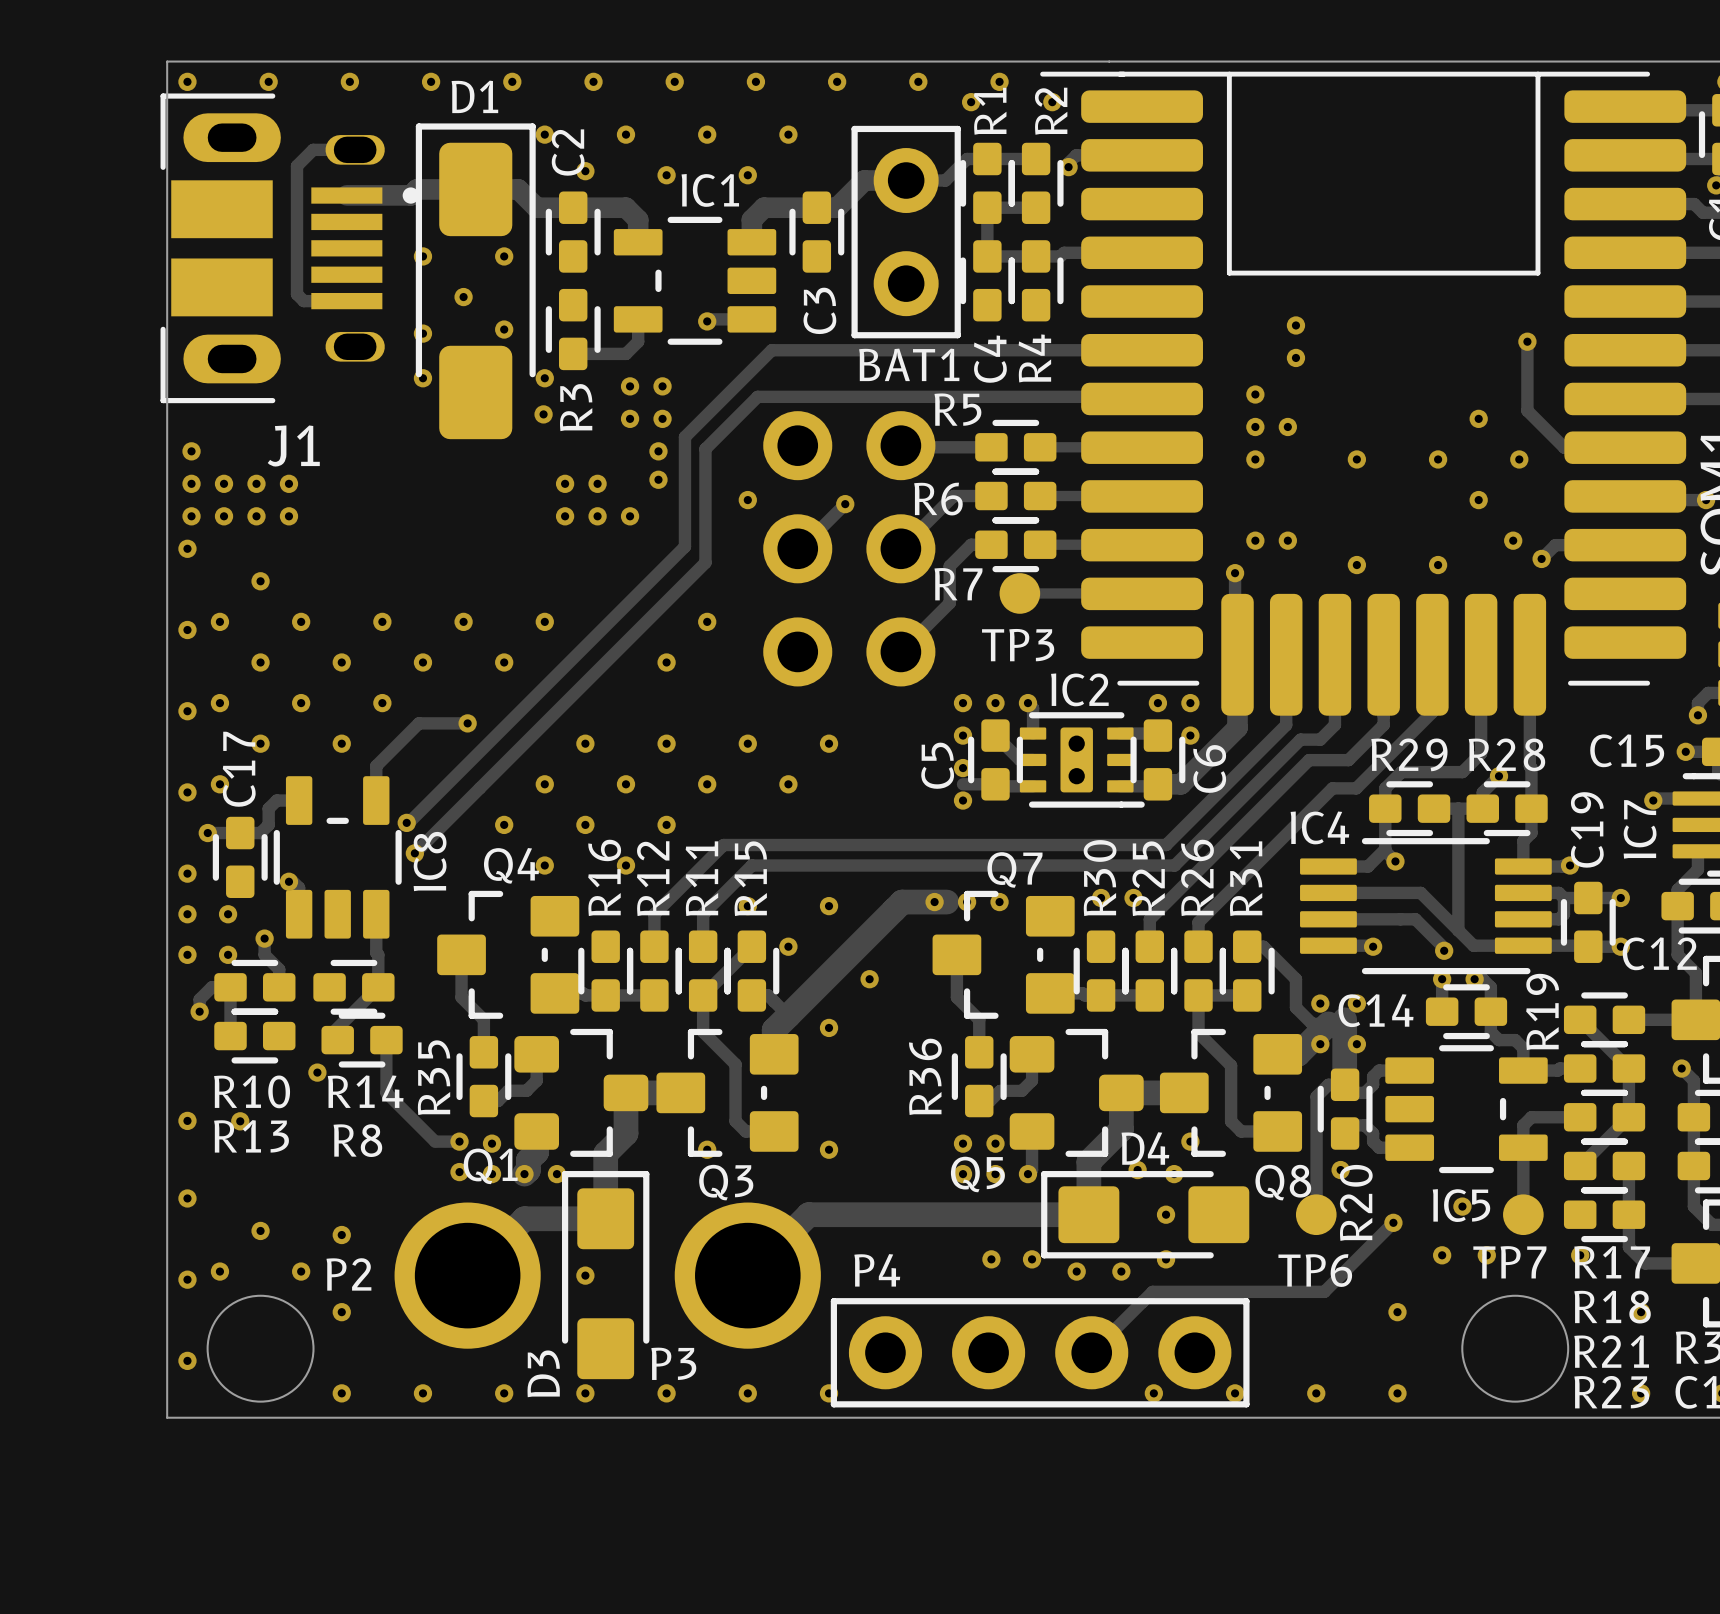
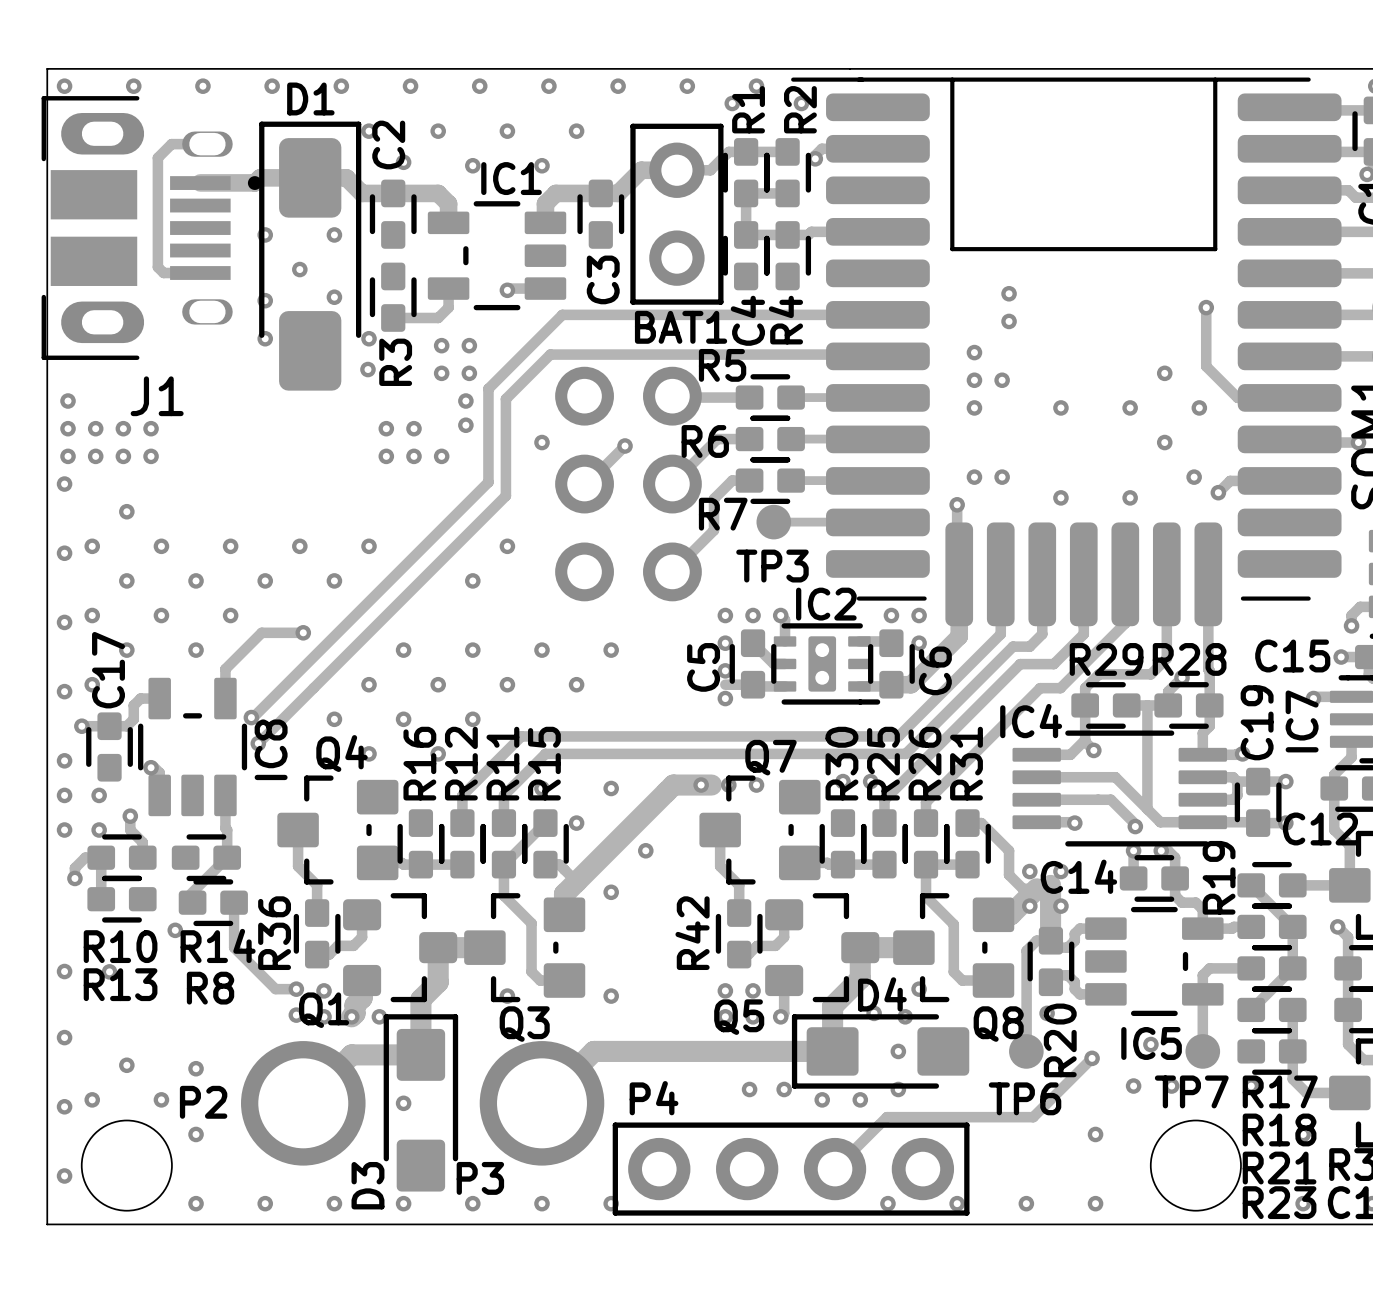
R36 name: R36 (925, 1076) -> R42 (692, 933)
R35 name: R35 (434, 1077) -> R36 (274, 933)

